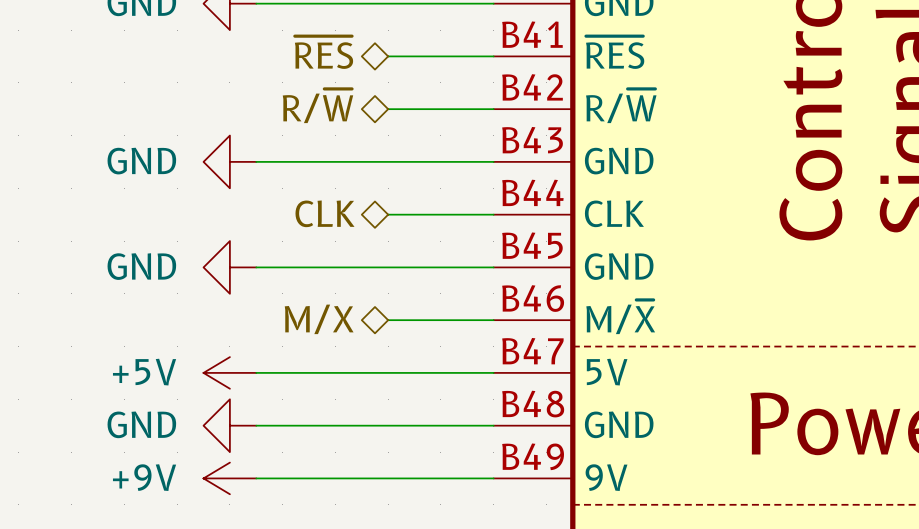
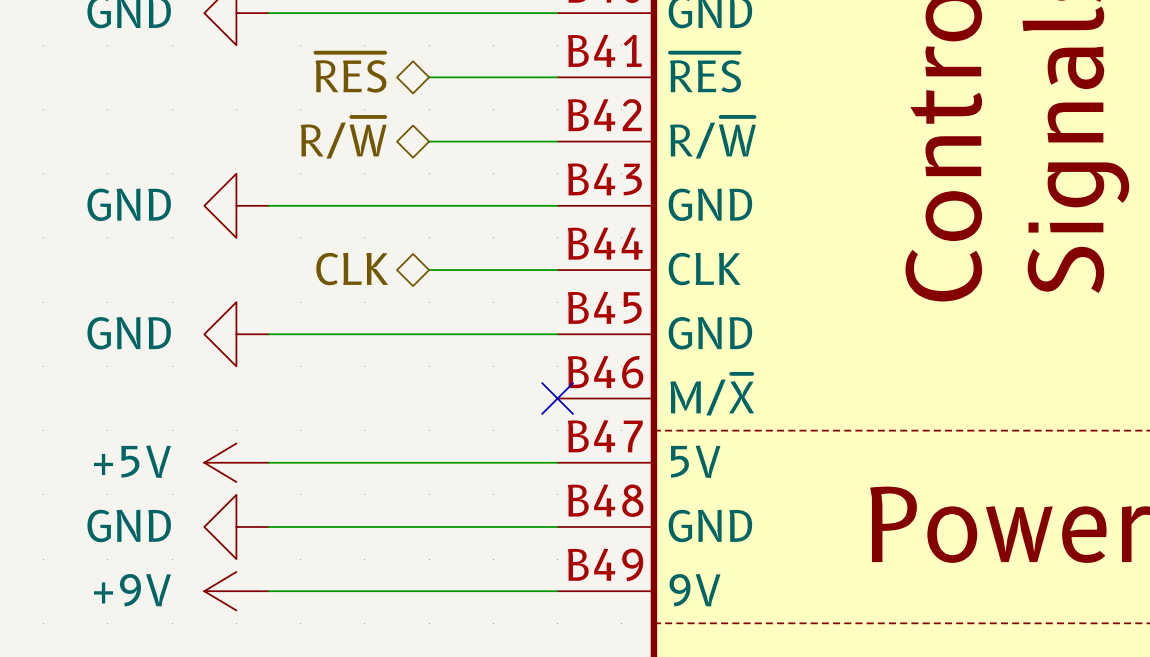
hierarchical label: M/X (319, 319) -> none
wire: (388, 320) (493, 320) -> none
no-connect mark: none -> (557, 398)

